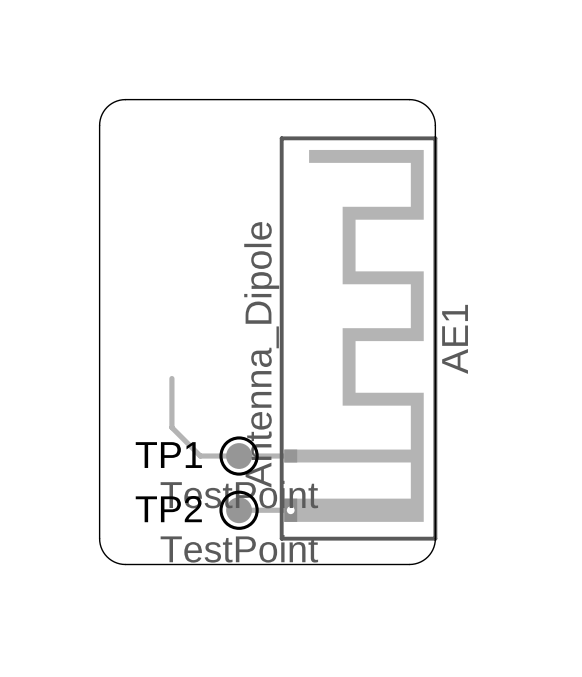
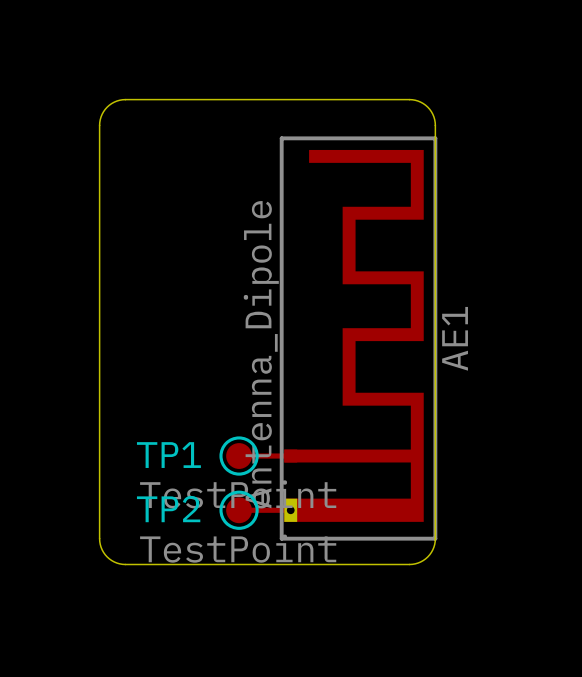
track: (171, 378) (171, 427) (200, 456) (239, 456) -> none

